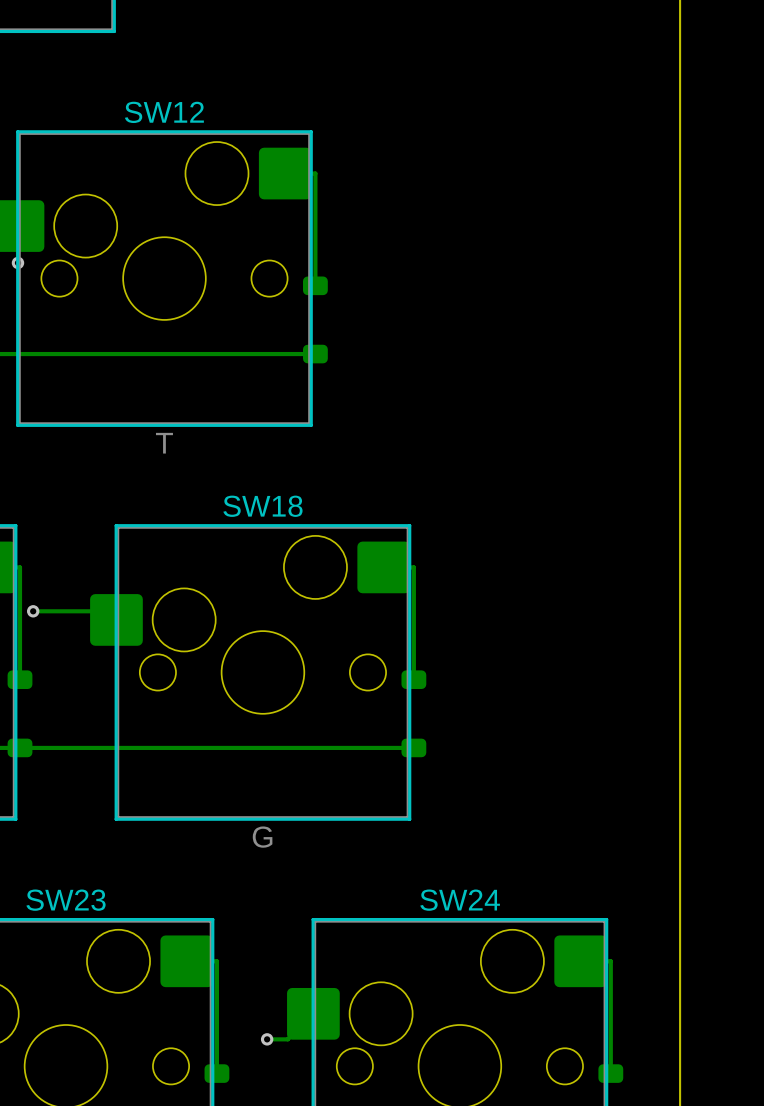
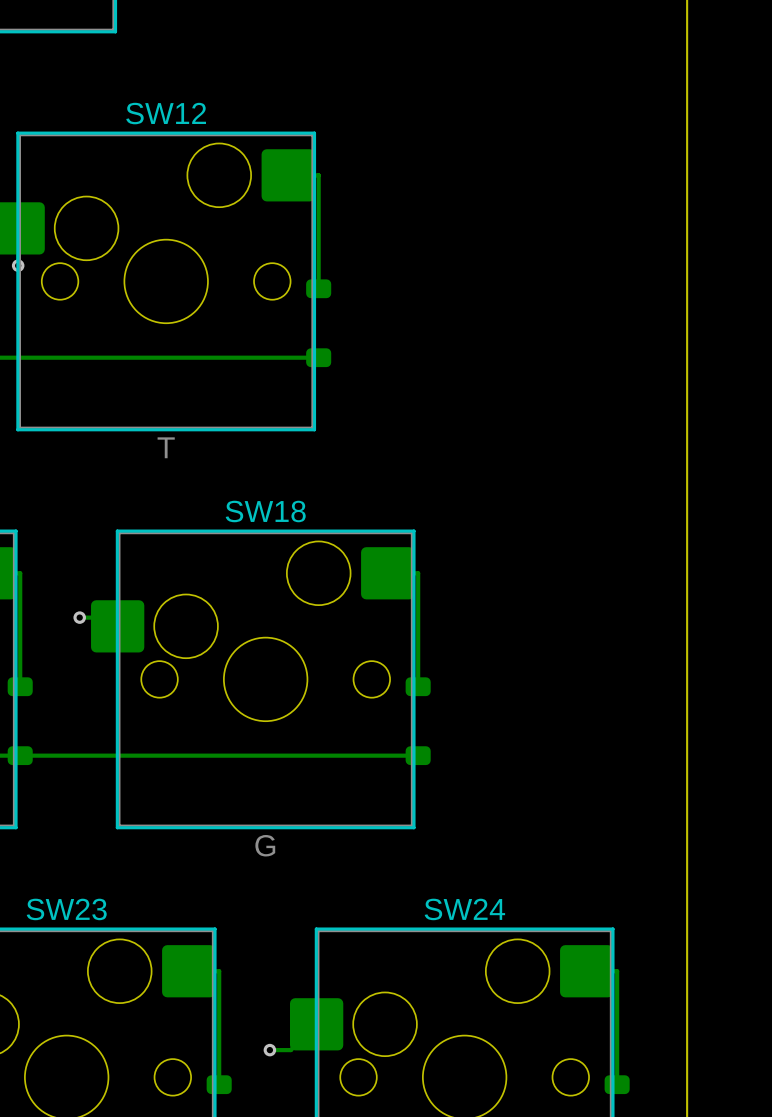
bottom track: (33, 611) (78, 611) -> none
via position: (33, 611) -> (79, 617)

